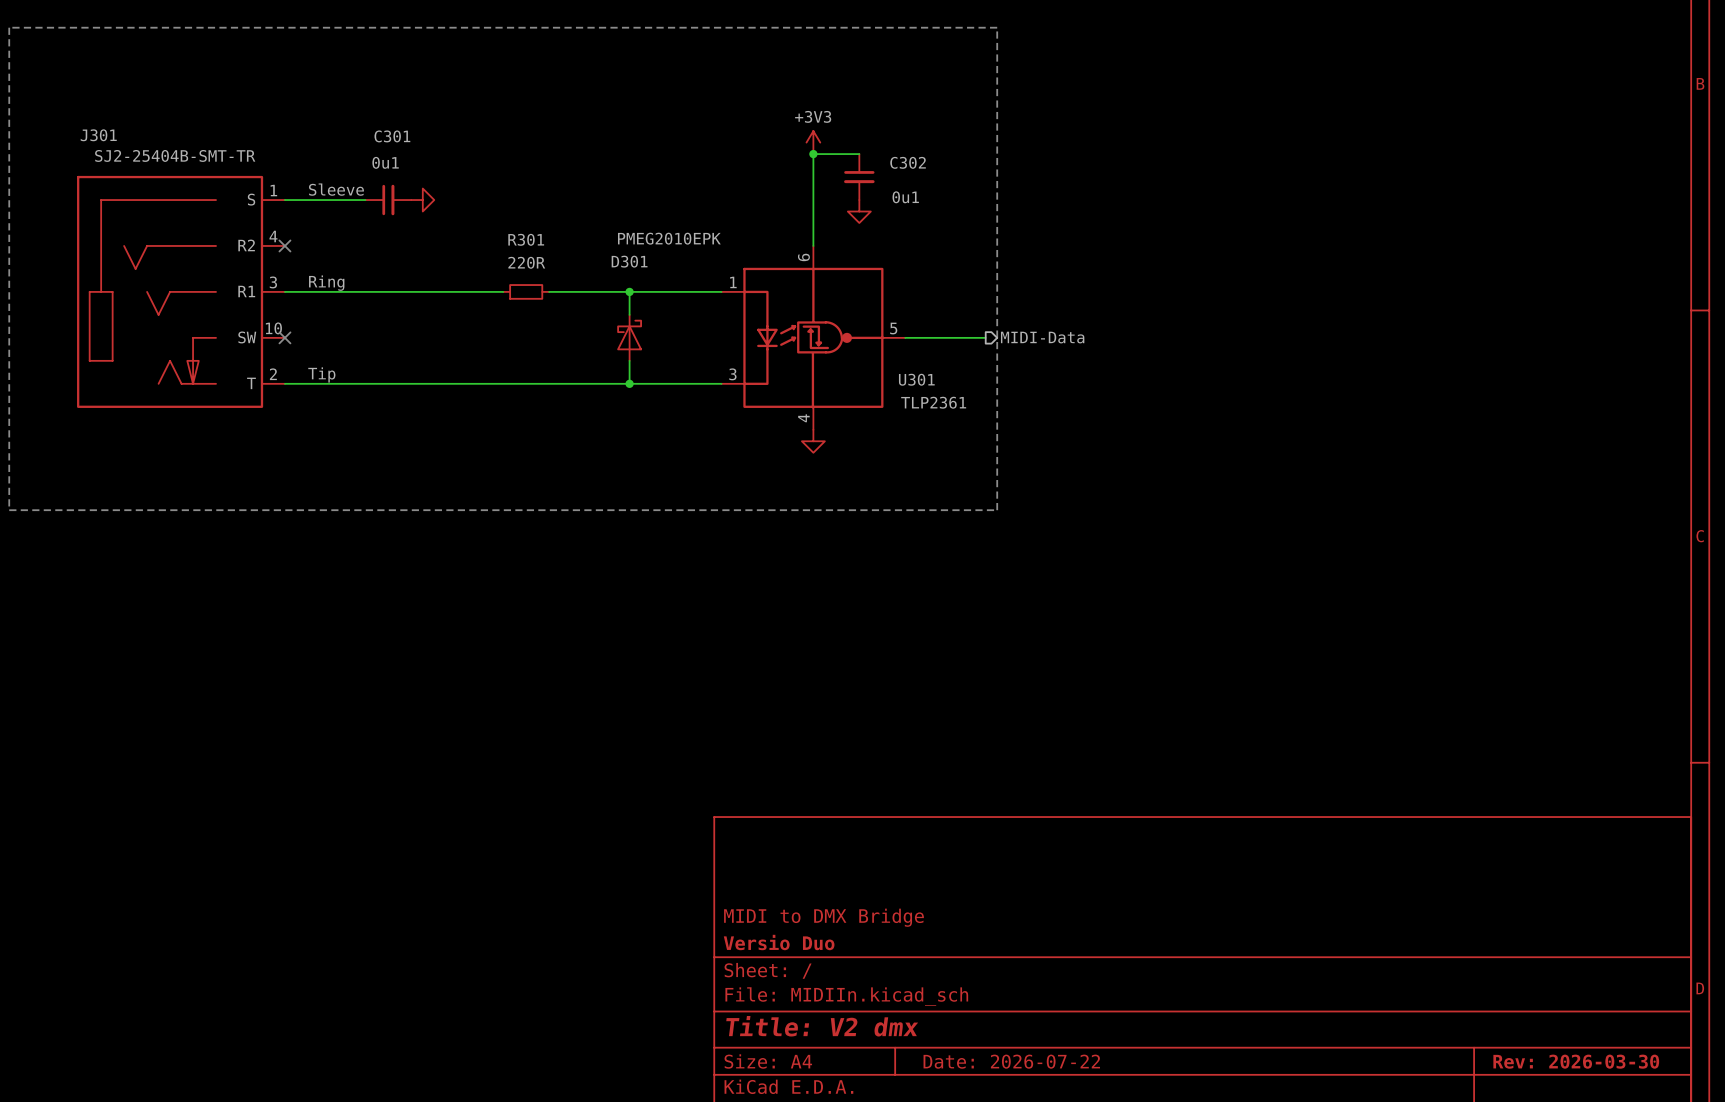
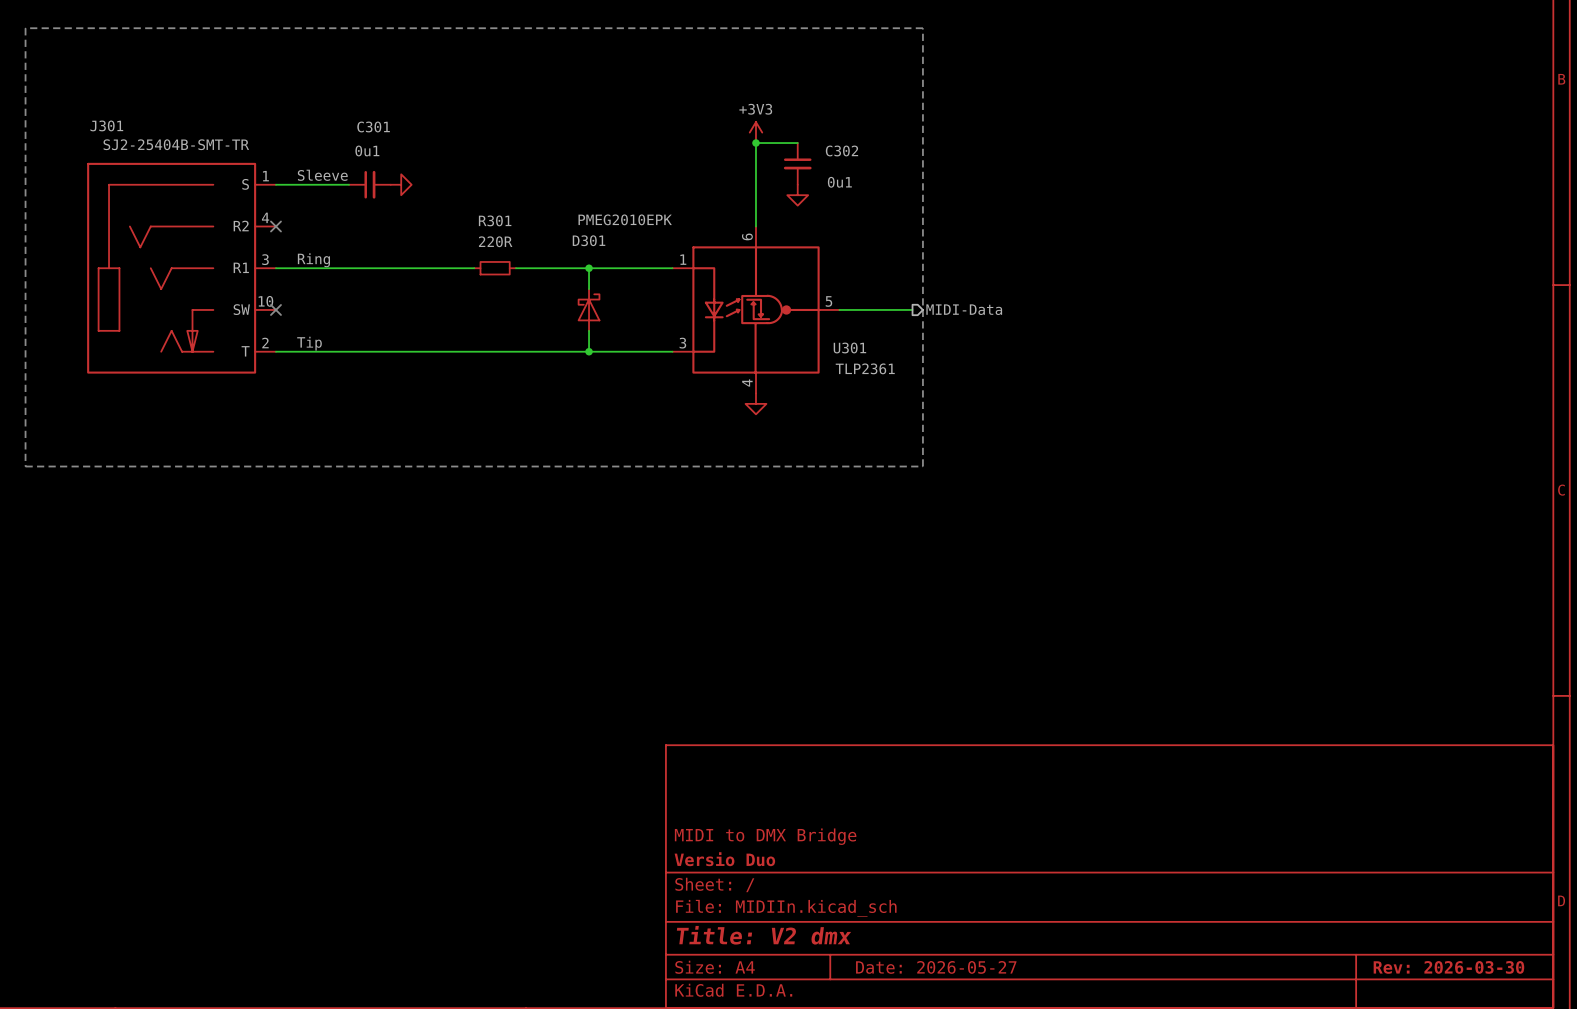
title block: Date: 2026-07-22 (1011, 1061) -> Date: 2026-05-27 (936, 967)

